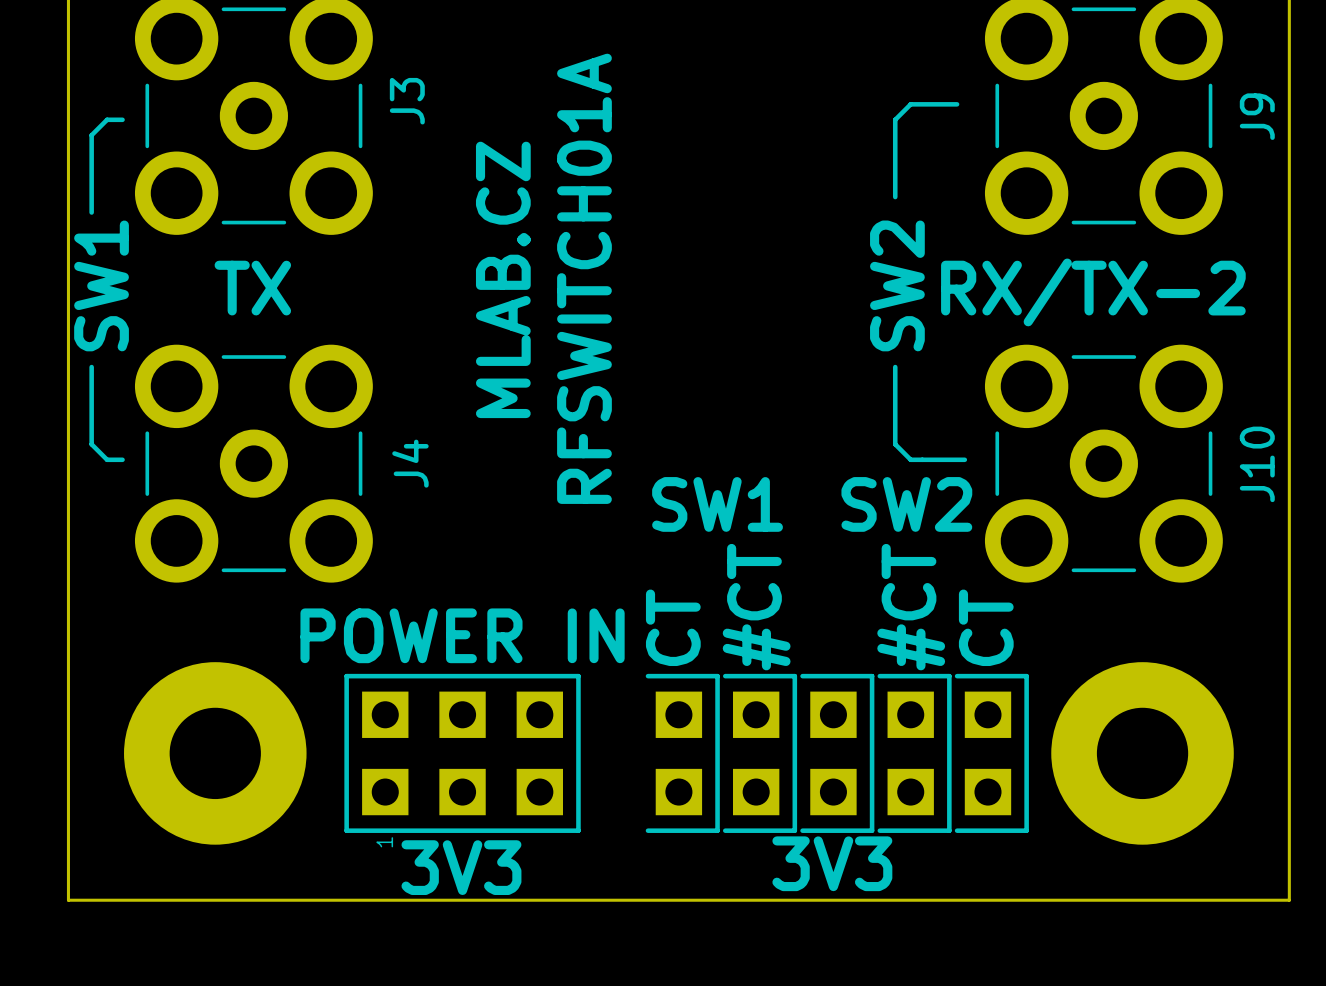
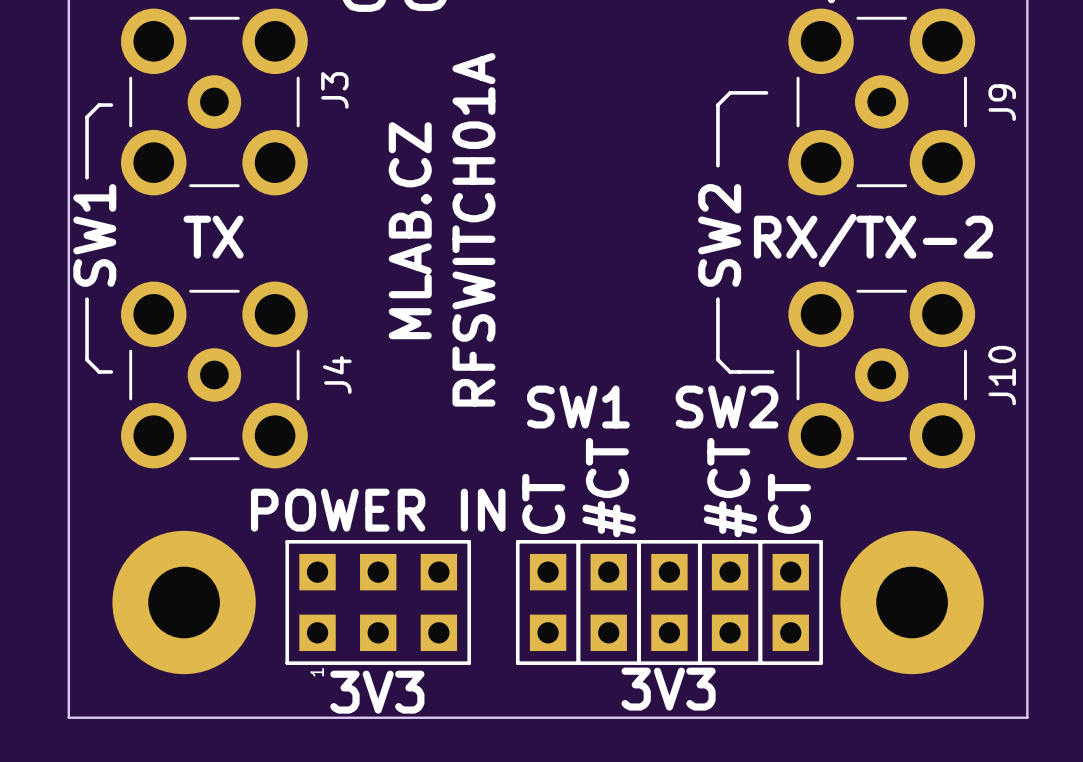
part footprint: [645, 673, 720, 833] -> [515, 540, 581, 665]
part footprint: [722, 673, 798, 833] -> [576, 540, 641, 665]
part footprint: [800, 673, 875, 833] -> [637, 540, 702, 665]
part footprint: [877, 673, 952, 833] -> [697, 540, 763, 665]
part footprint: [954, 673, 1029, 833] -> [758, 540, 823, 665]

